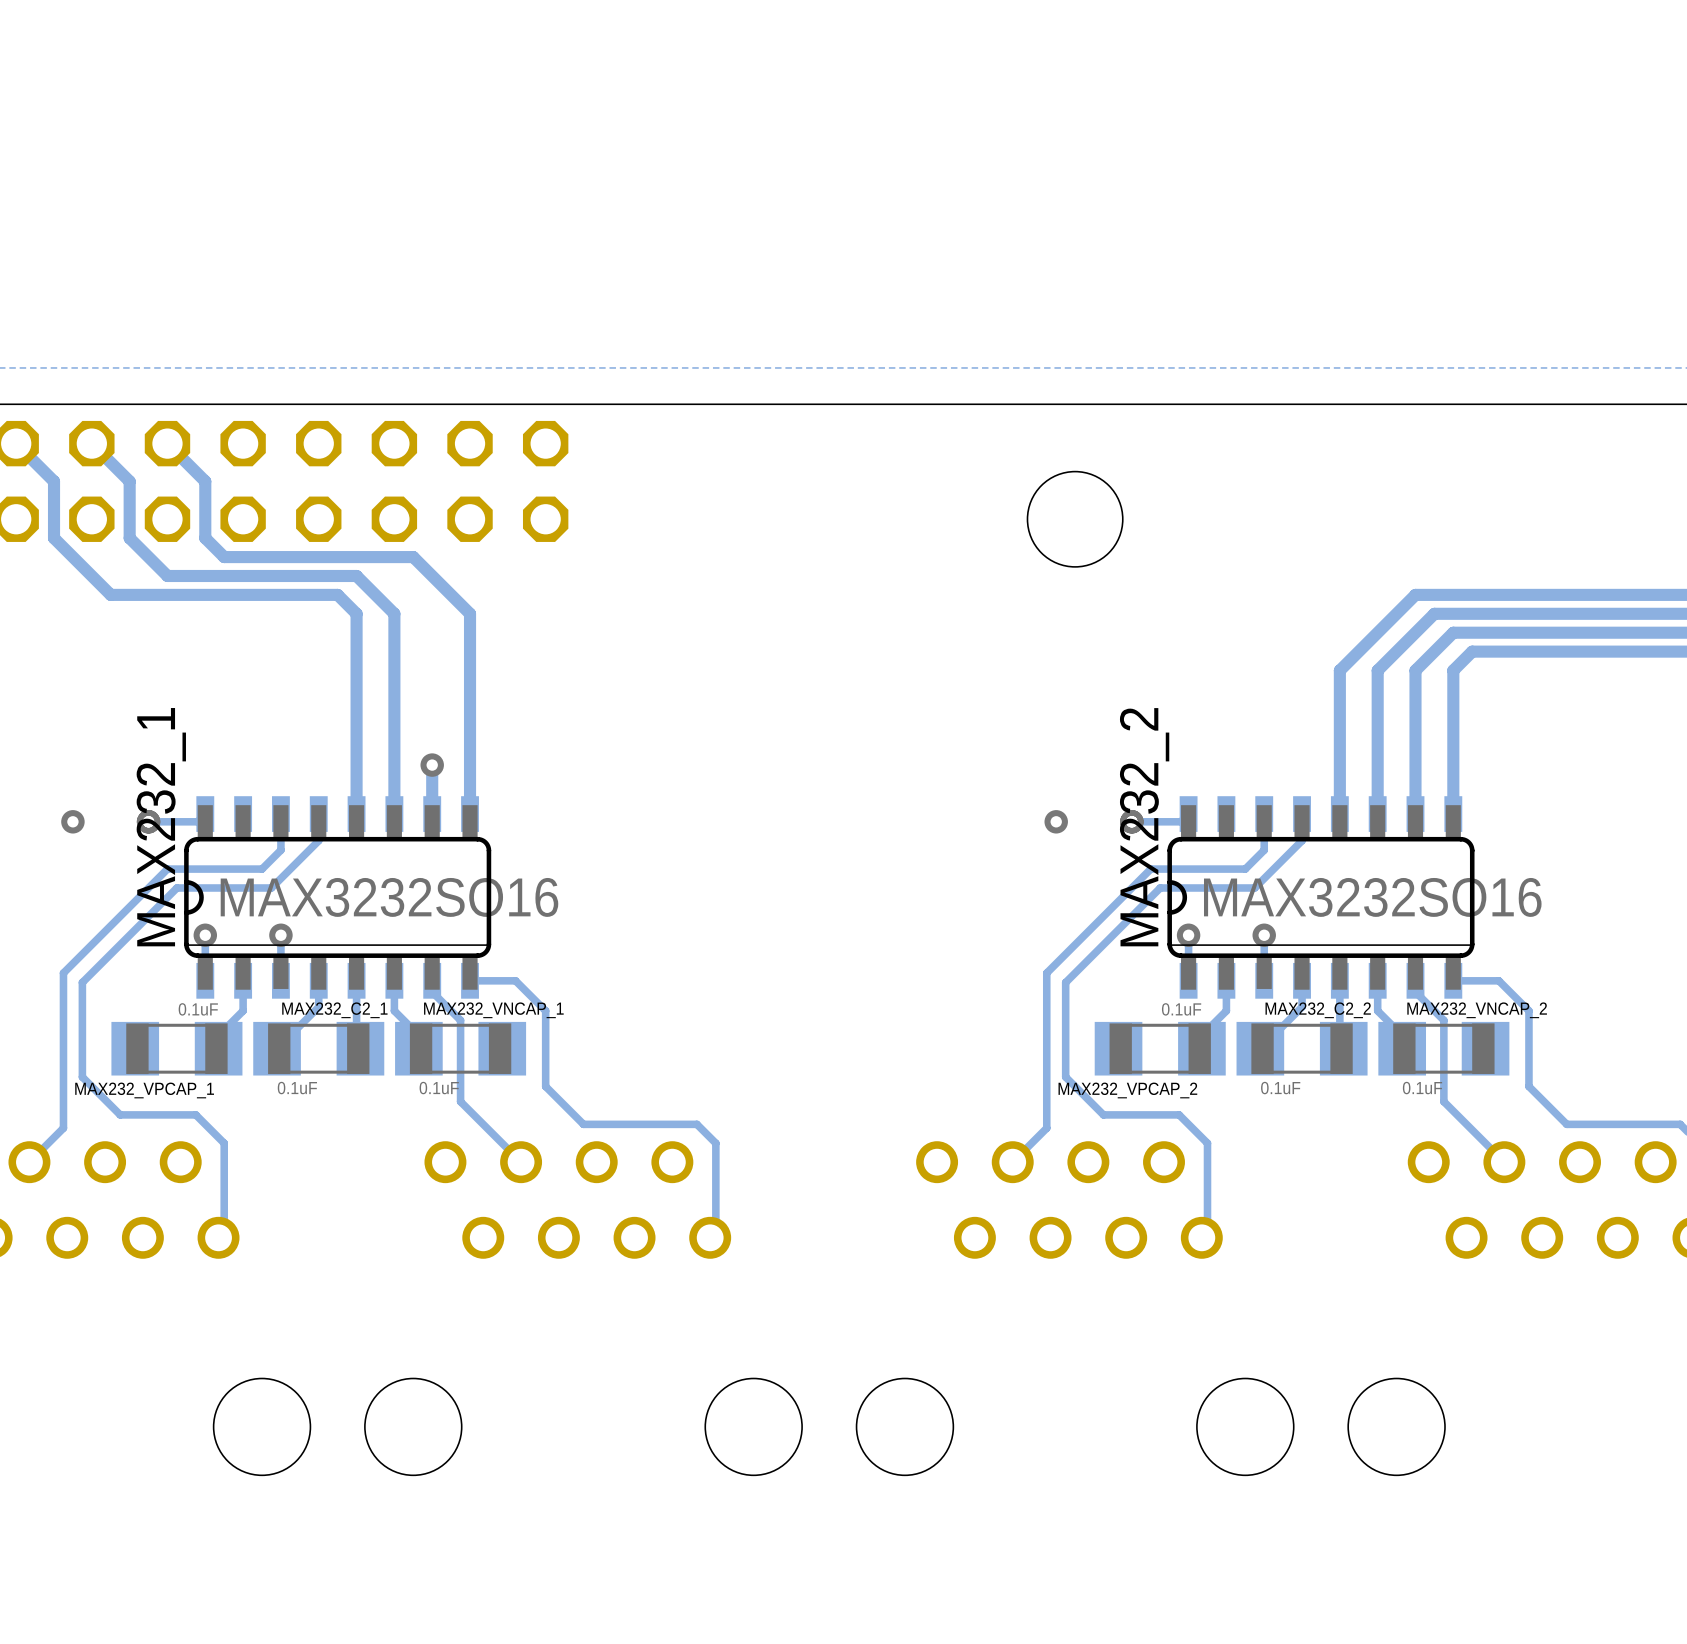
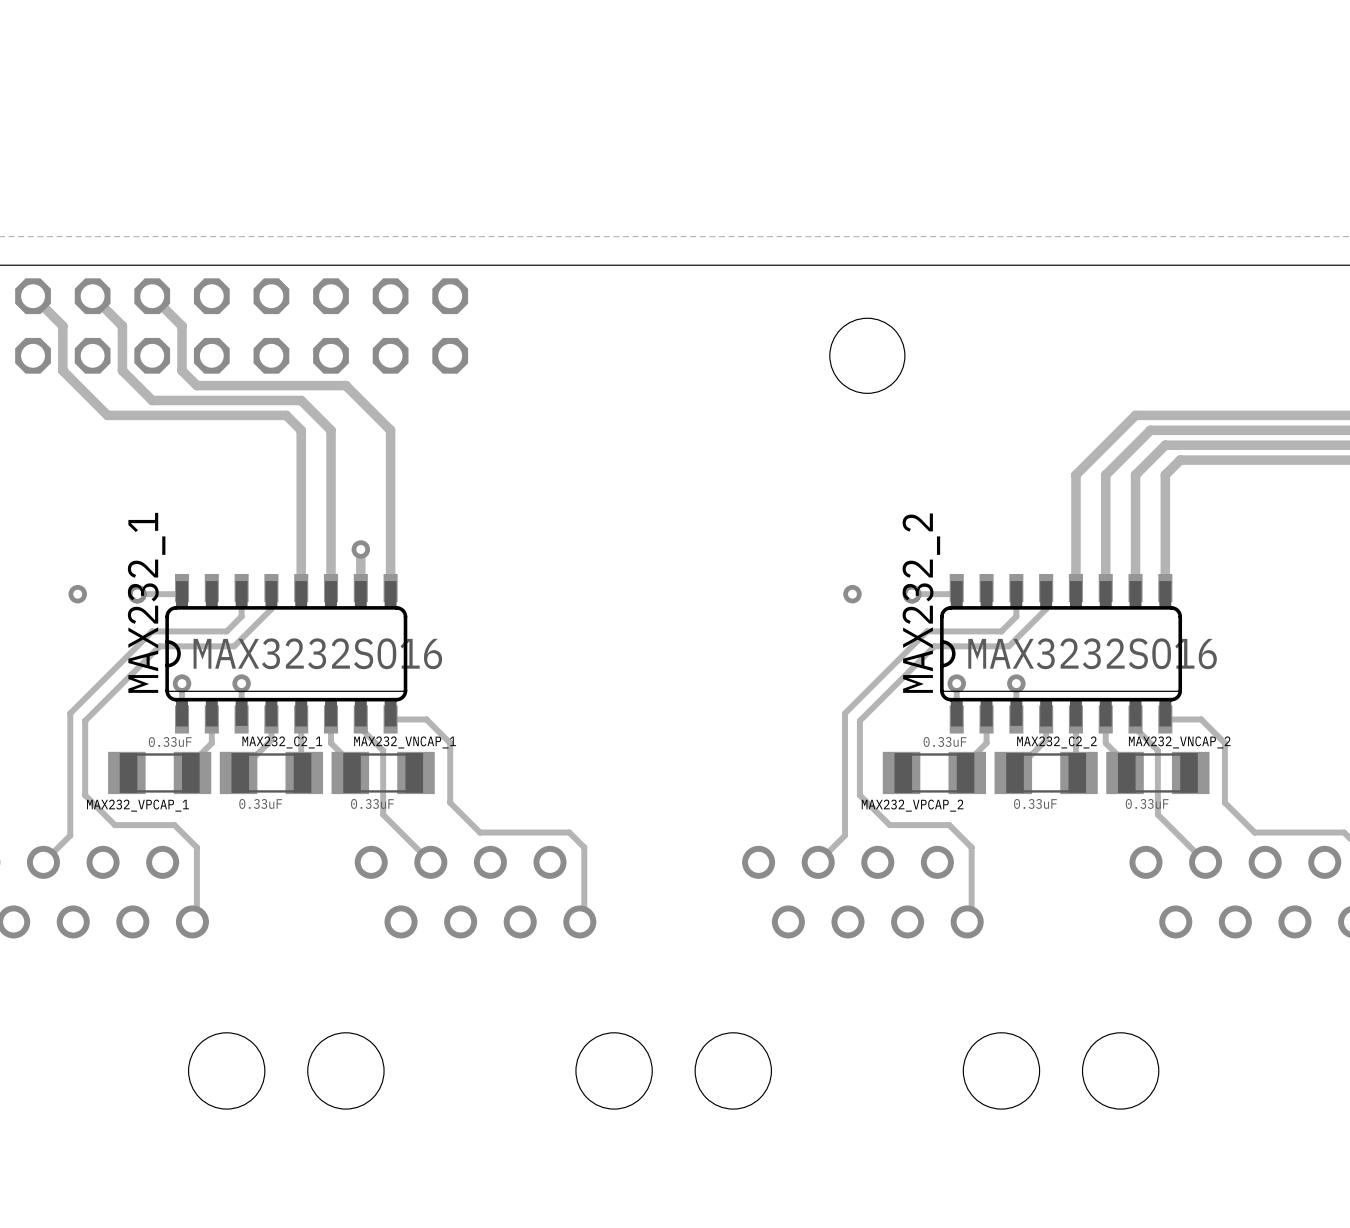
MAX232_VPCAP_1 value: 0.1uF (198, 1009) -> 0.33uF (170, 741)
MAX232_VPCAP_2 value: 0.1uF (1181, 1009) -> 0.33uF (944, 741)
MAX232_C2_1 value: 0.1uF (297, 1088) -> 0.33uF (260, 803)
MAX232_VNCAP_1 value: 0.1uF (439, 1088) -> 0.33uF (372, 803)
MAX232_C2_2 value: 0.1uF (1280, 1088) -> 0.33uF (1035, 803)
MAX232_VNCAP_2 value: 0.1uF (1422, 1088) -> 0.33uF (1147, 803)

